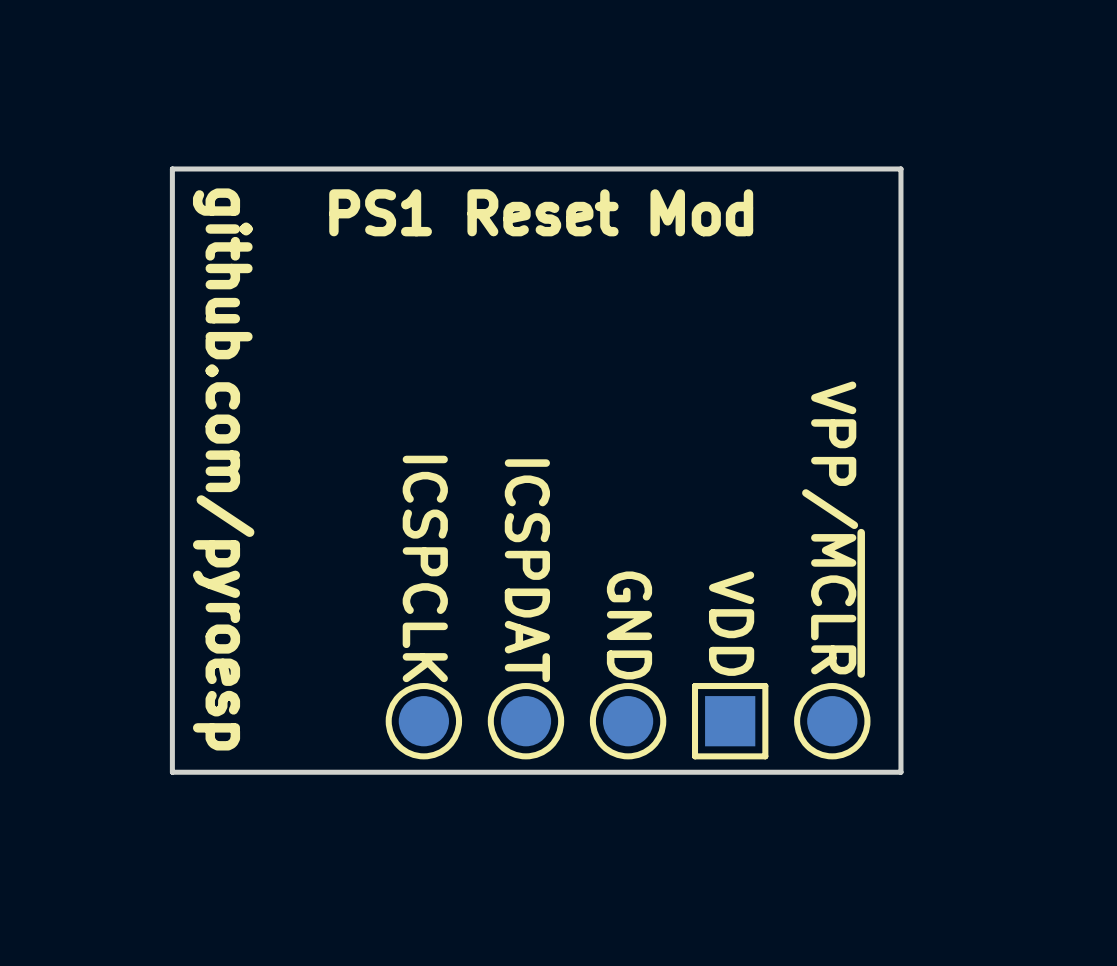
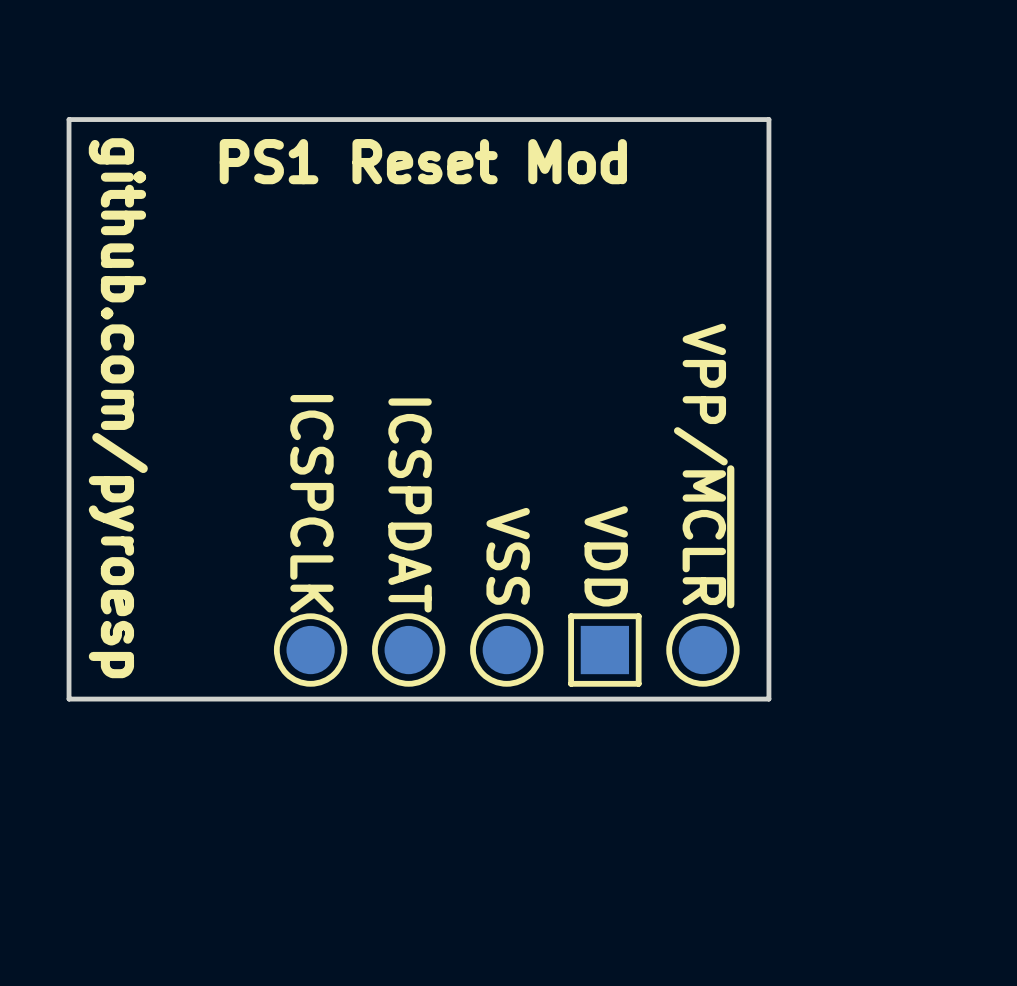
GND name: GND (629, 625) -> VSS (508, 556)

